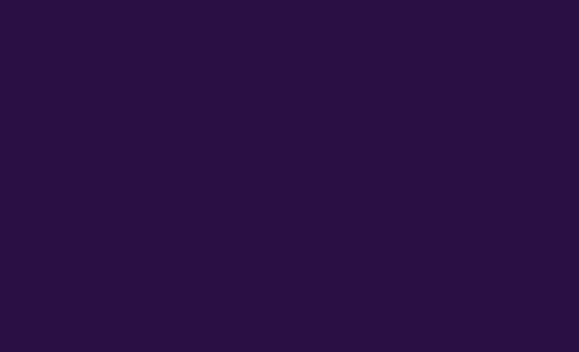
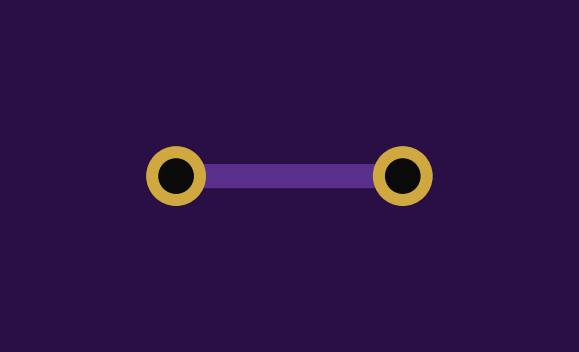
via: none -> (176, 176)
track: none -> (402, 176) (176, 176)
via: none -> (402, 176)

